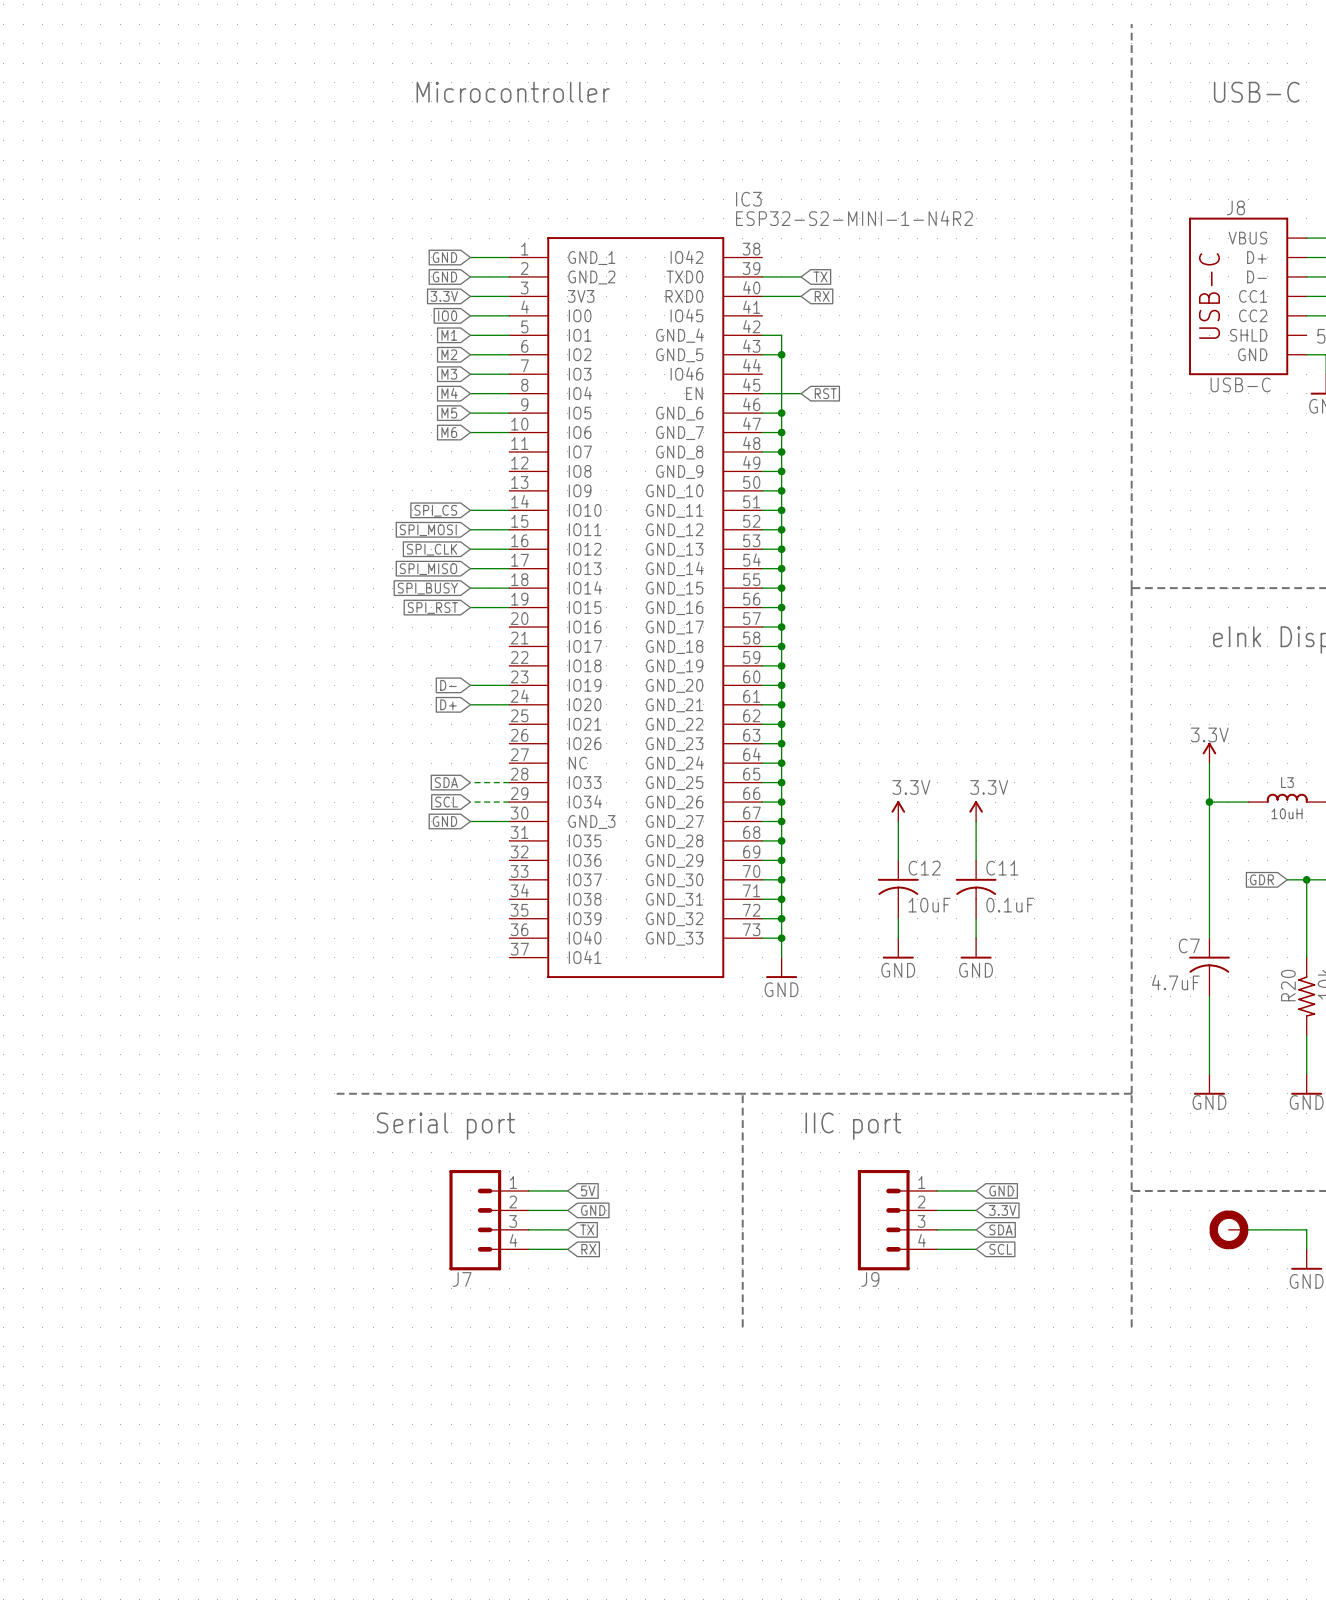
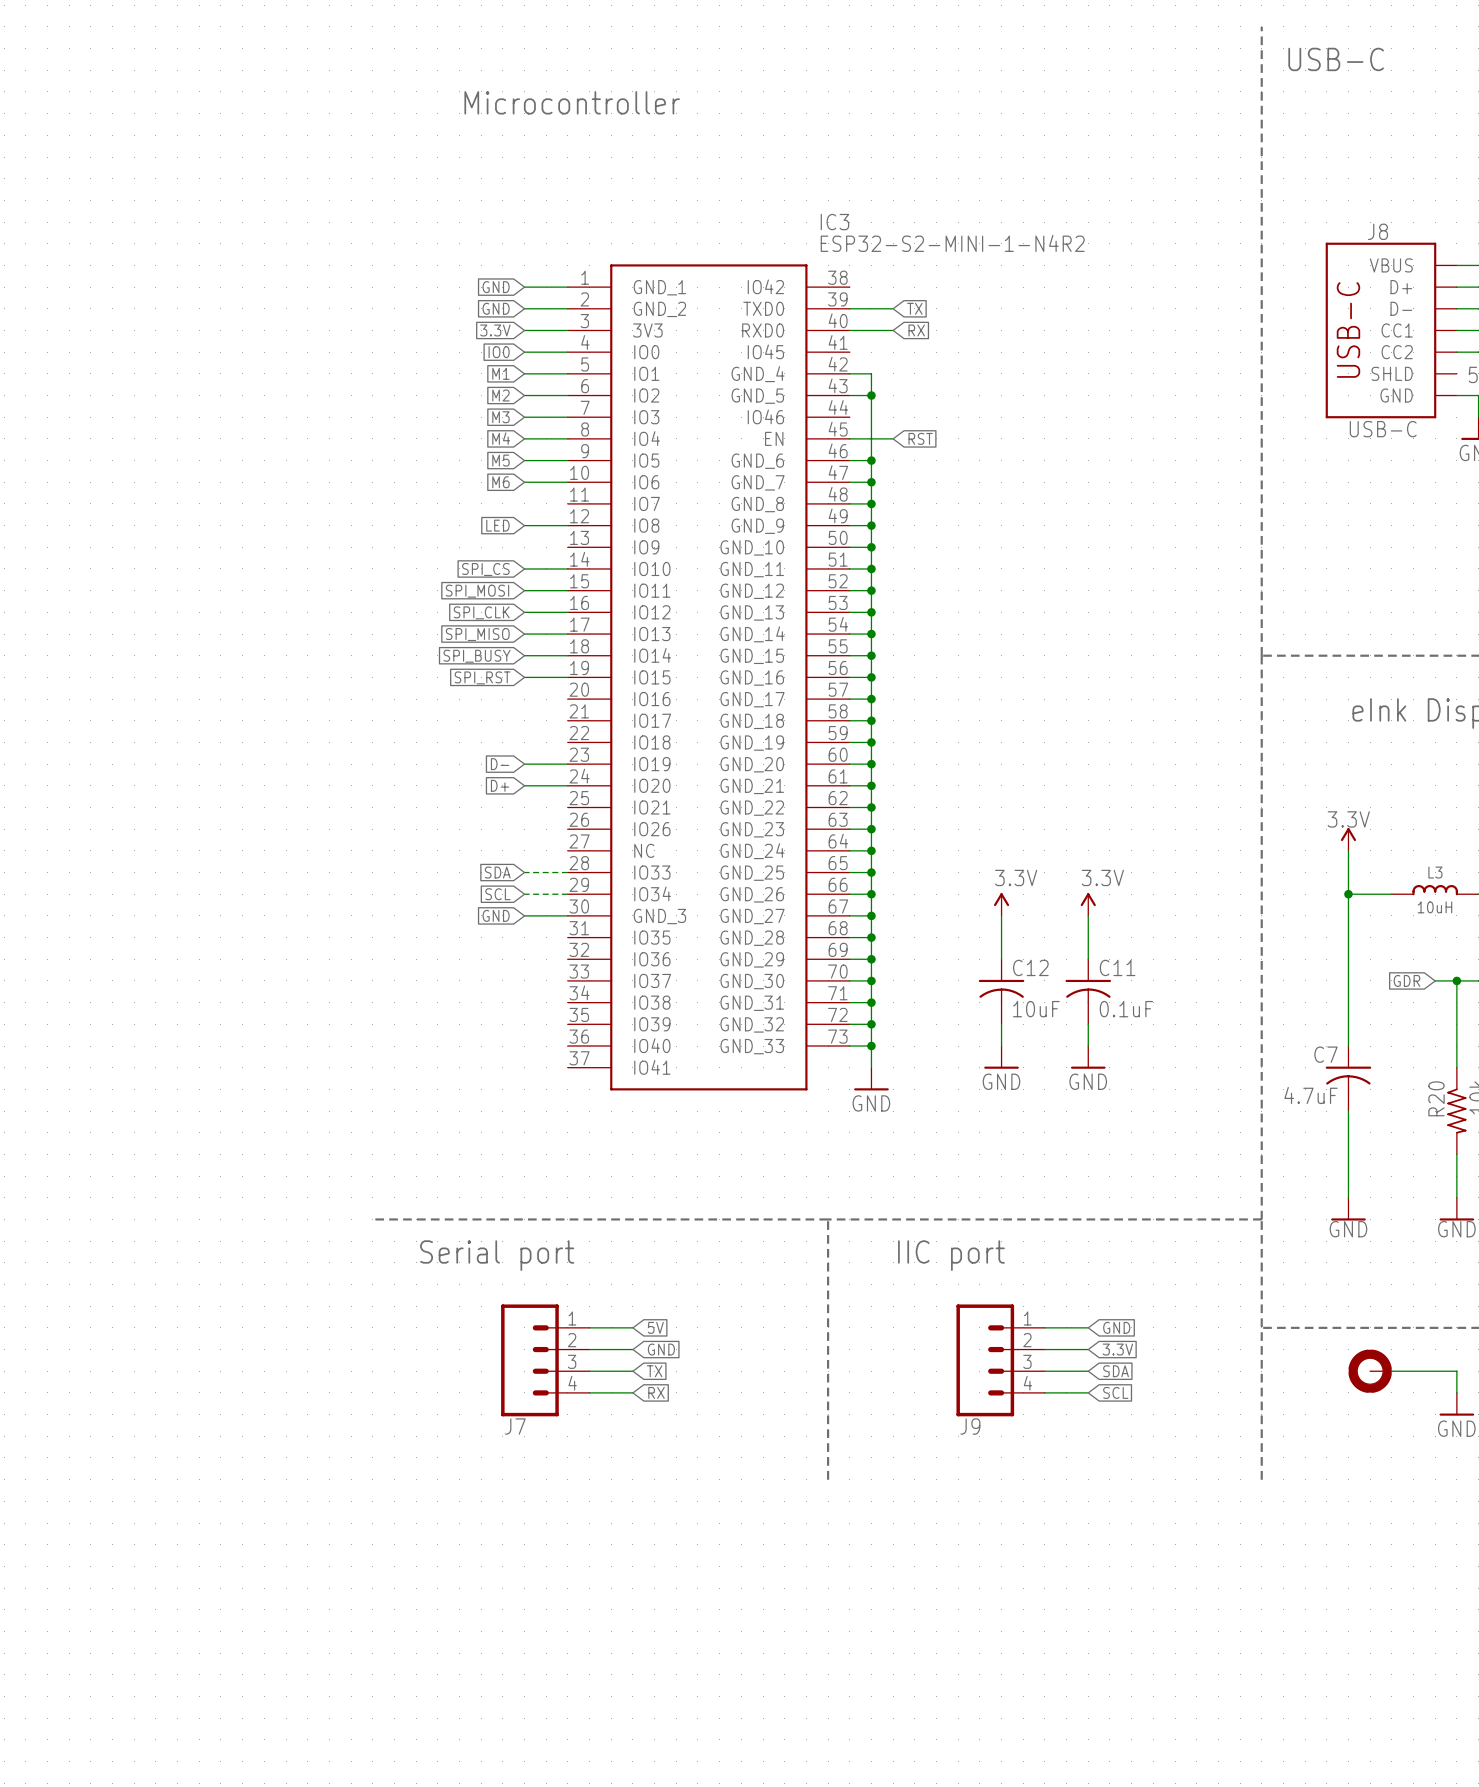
text position: USB-C (1256, 92) -> USB-C (1336, 59)
global label: none -> LED (497, 525)
wire: none -> (524, 525) (567, 525)

